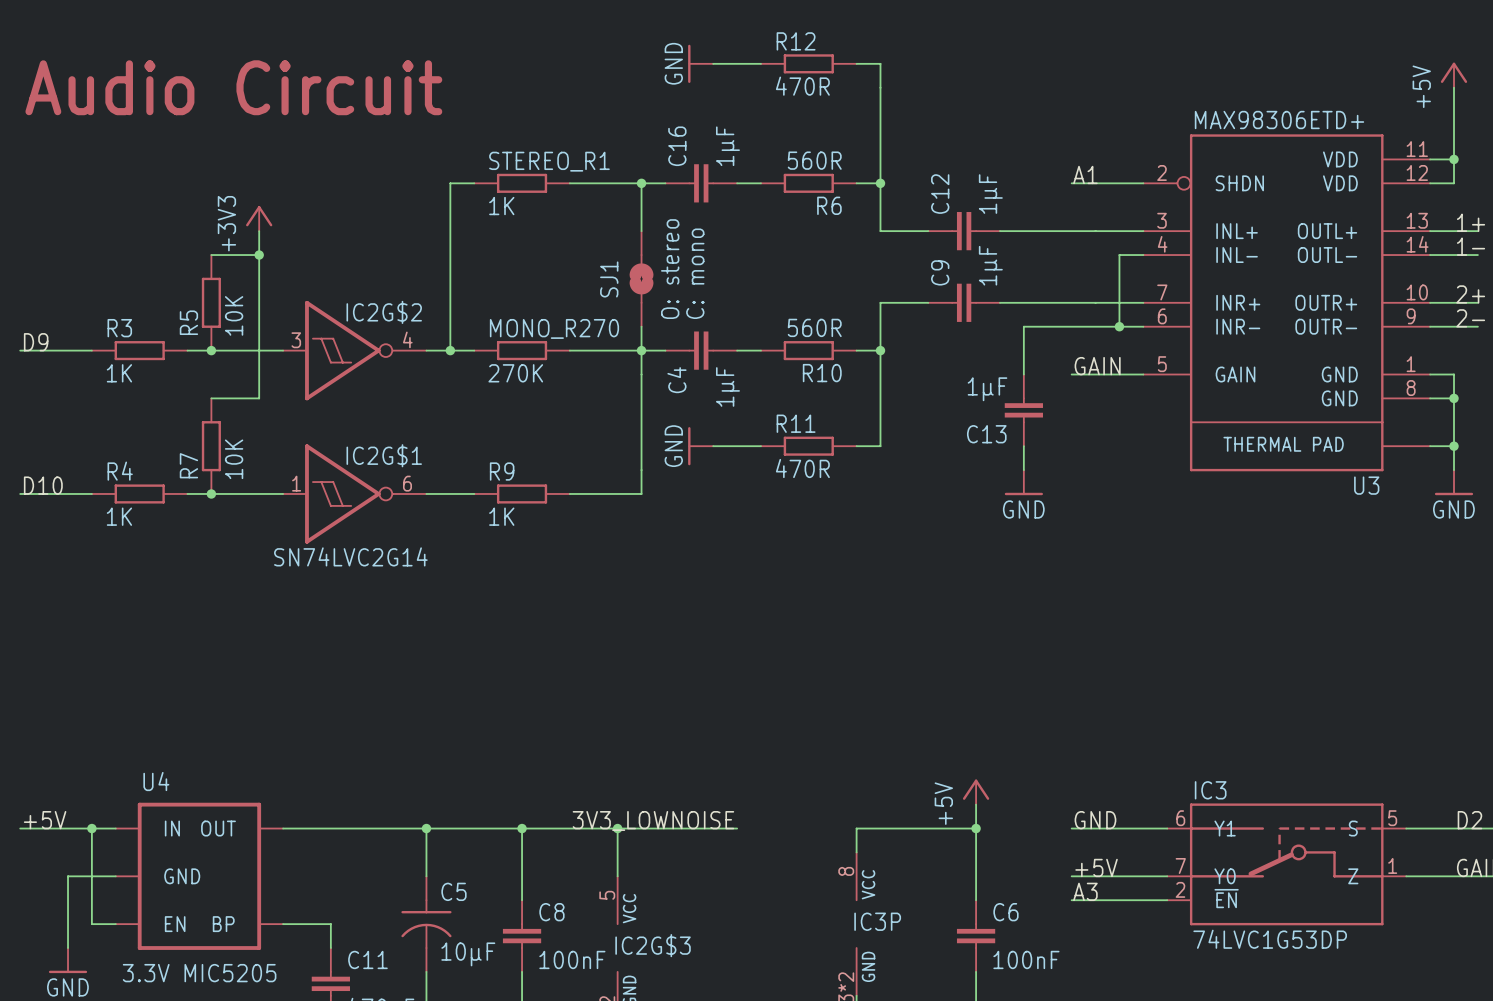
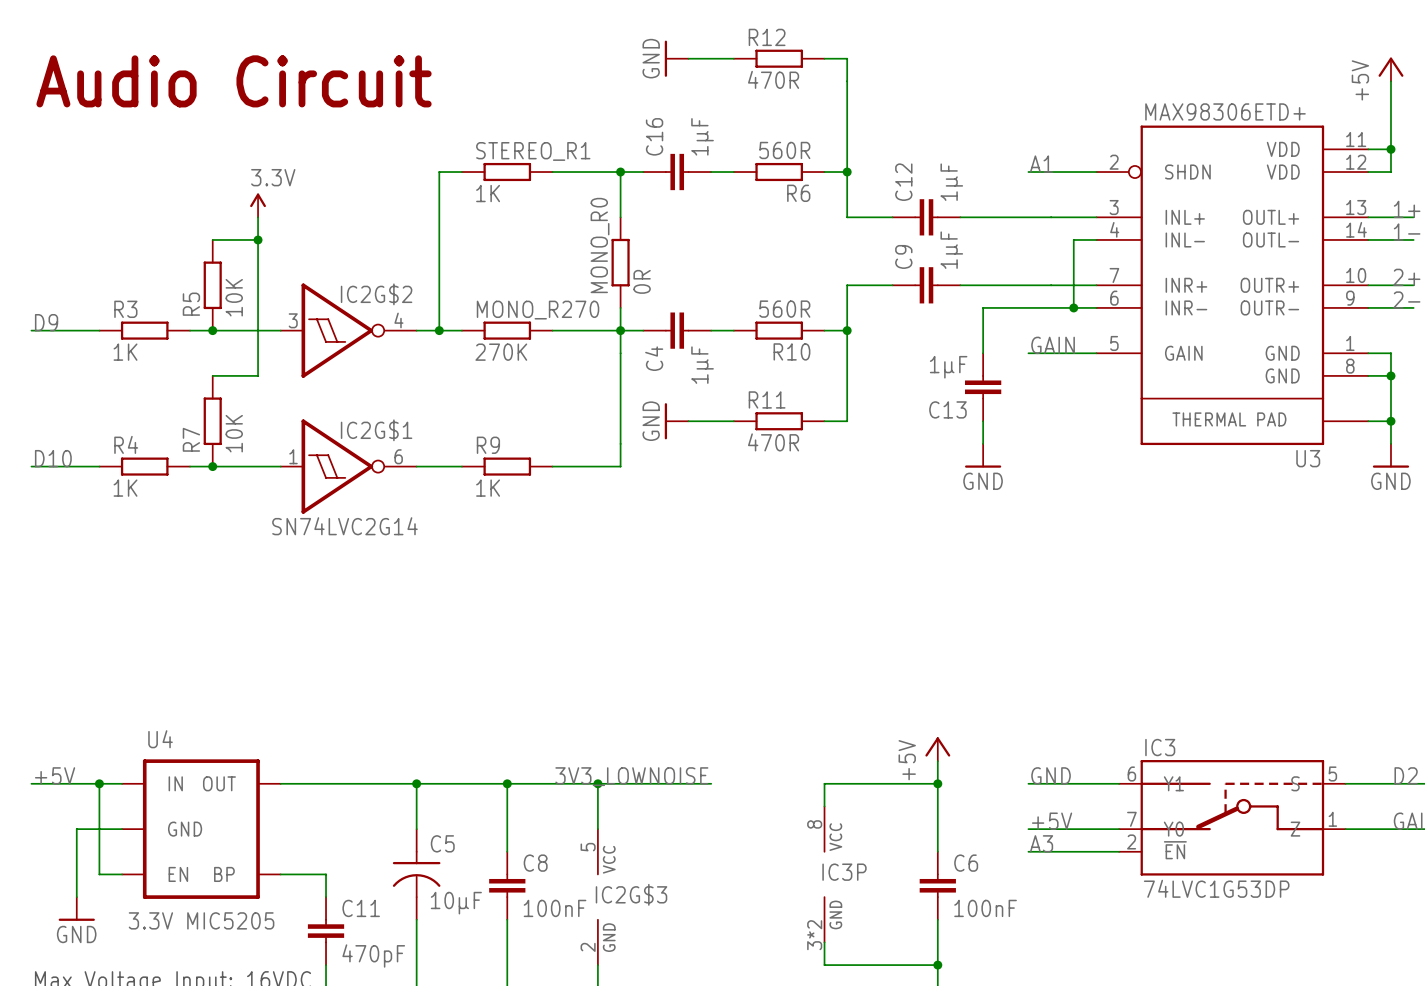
power symbol: +3V3 (259, 218) -> 3.3V (258, 205)
text: O: stereo (670, 269) -> none
text: C: mono (695, 273) -> none
SJ1: (641, 278) -> none
MONO_R0: none -> 0R (620, 262)

